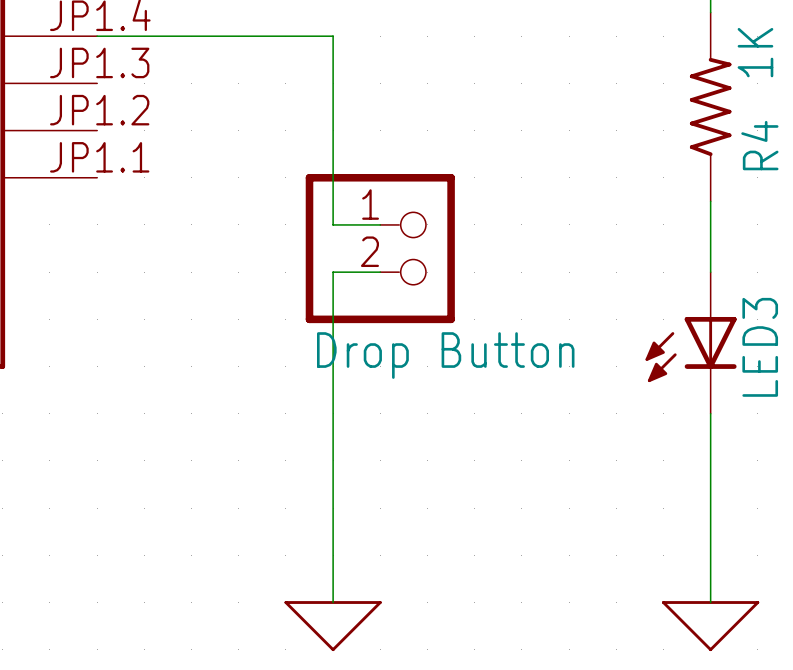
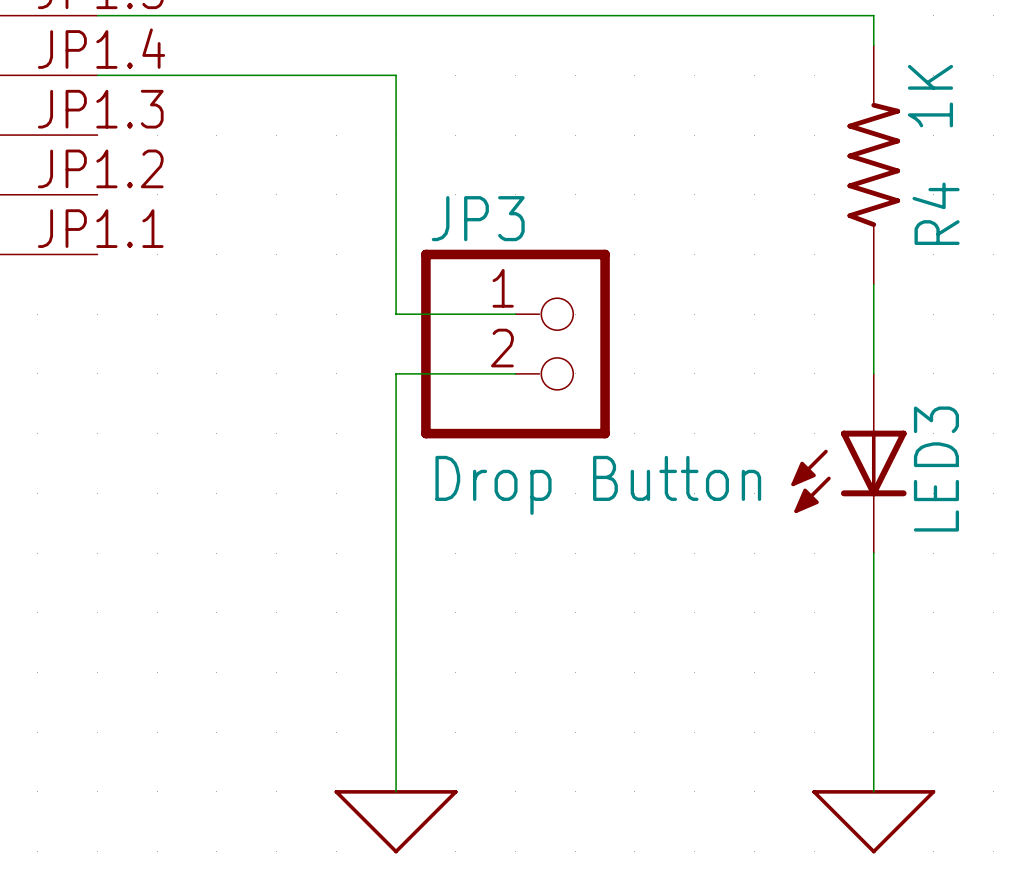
wire: none -> (455, 314) (515, 314)
part: Drop Button (380, 248) -> none
JP3: none -> (515, 344)
wire: none -> (455, 373) (515, 373)
text: none -> Drop Button (598, 485)

